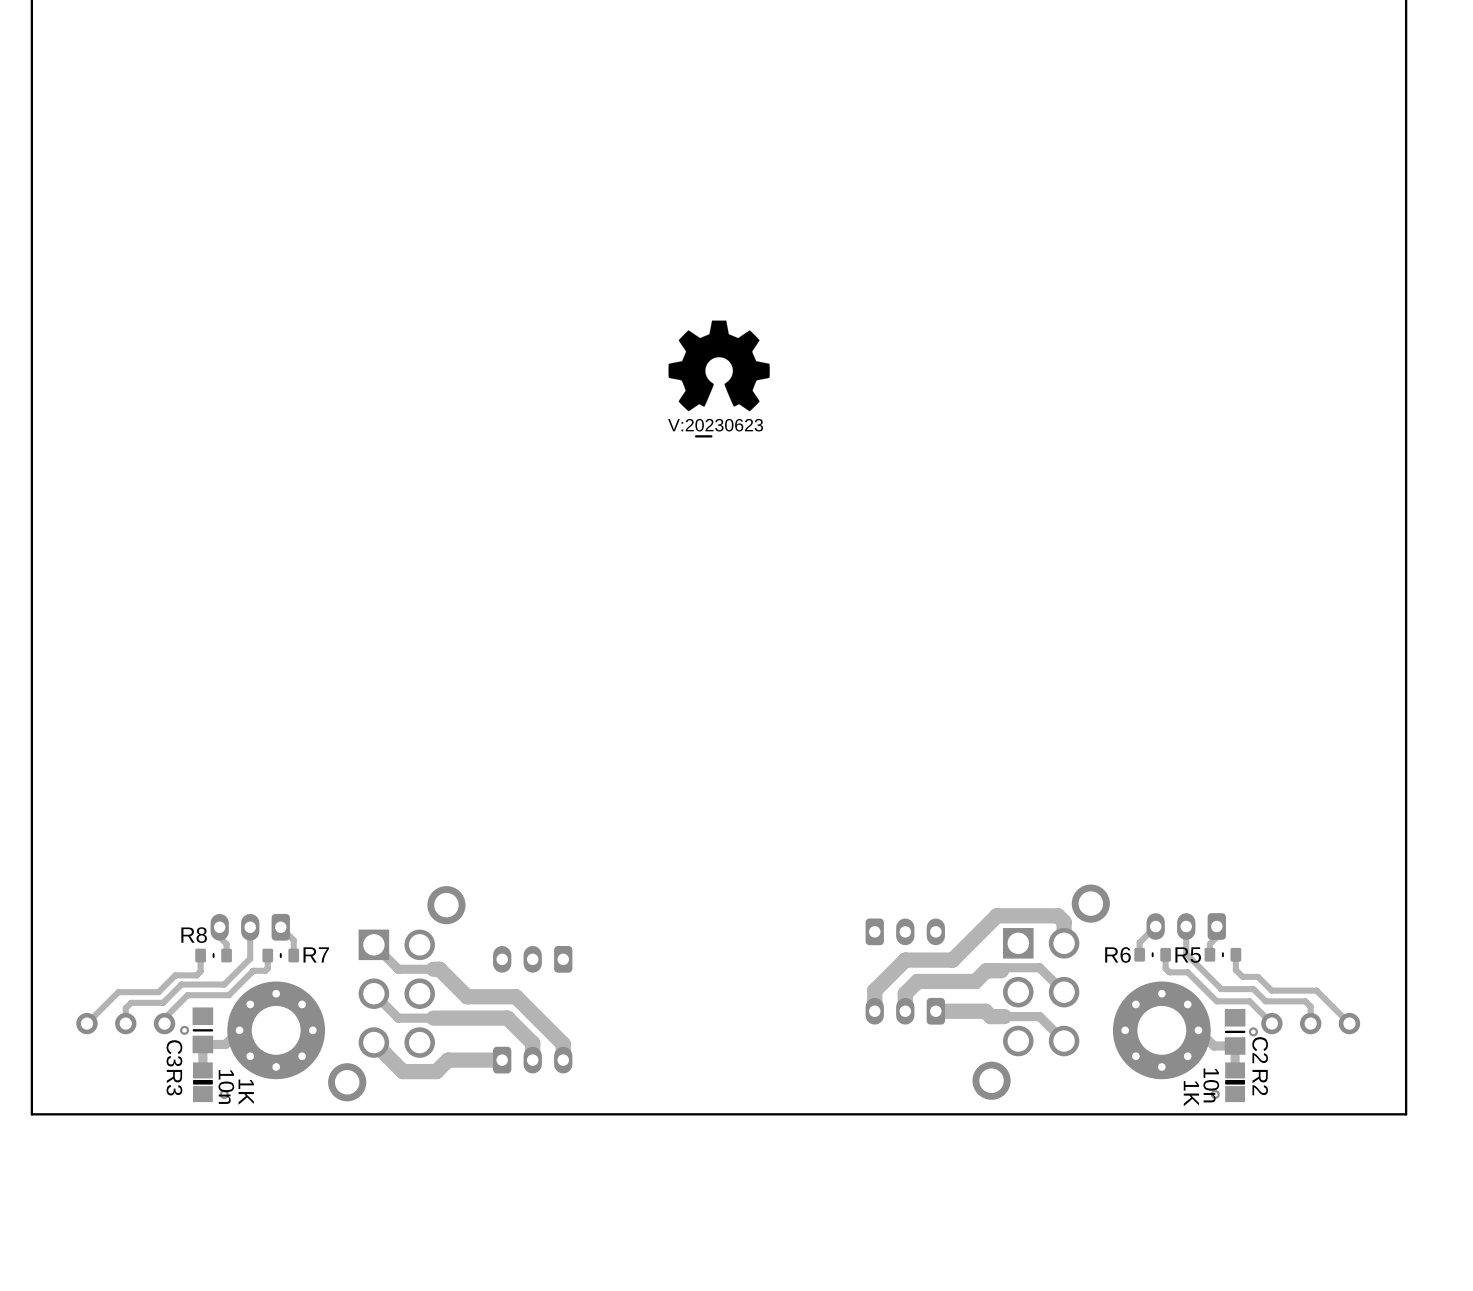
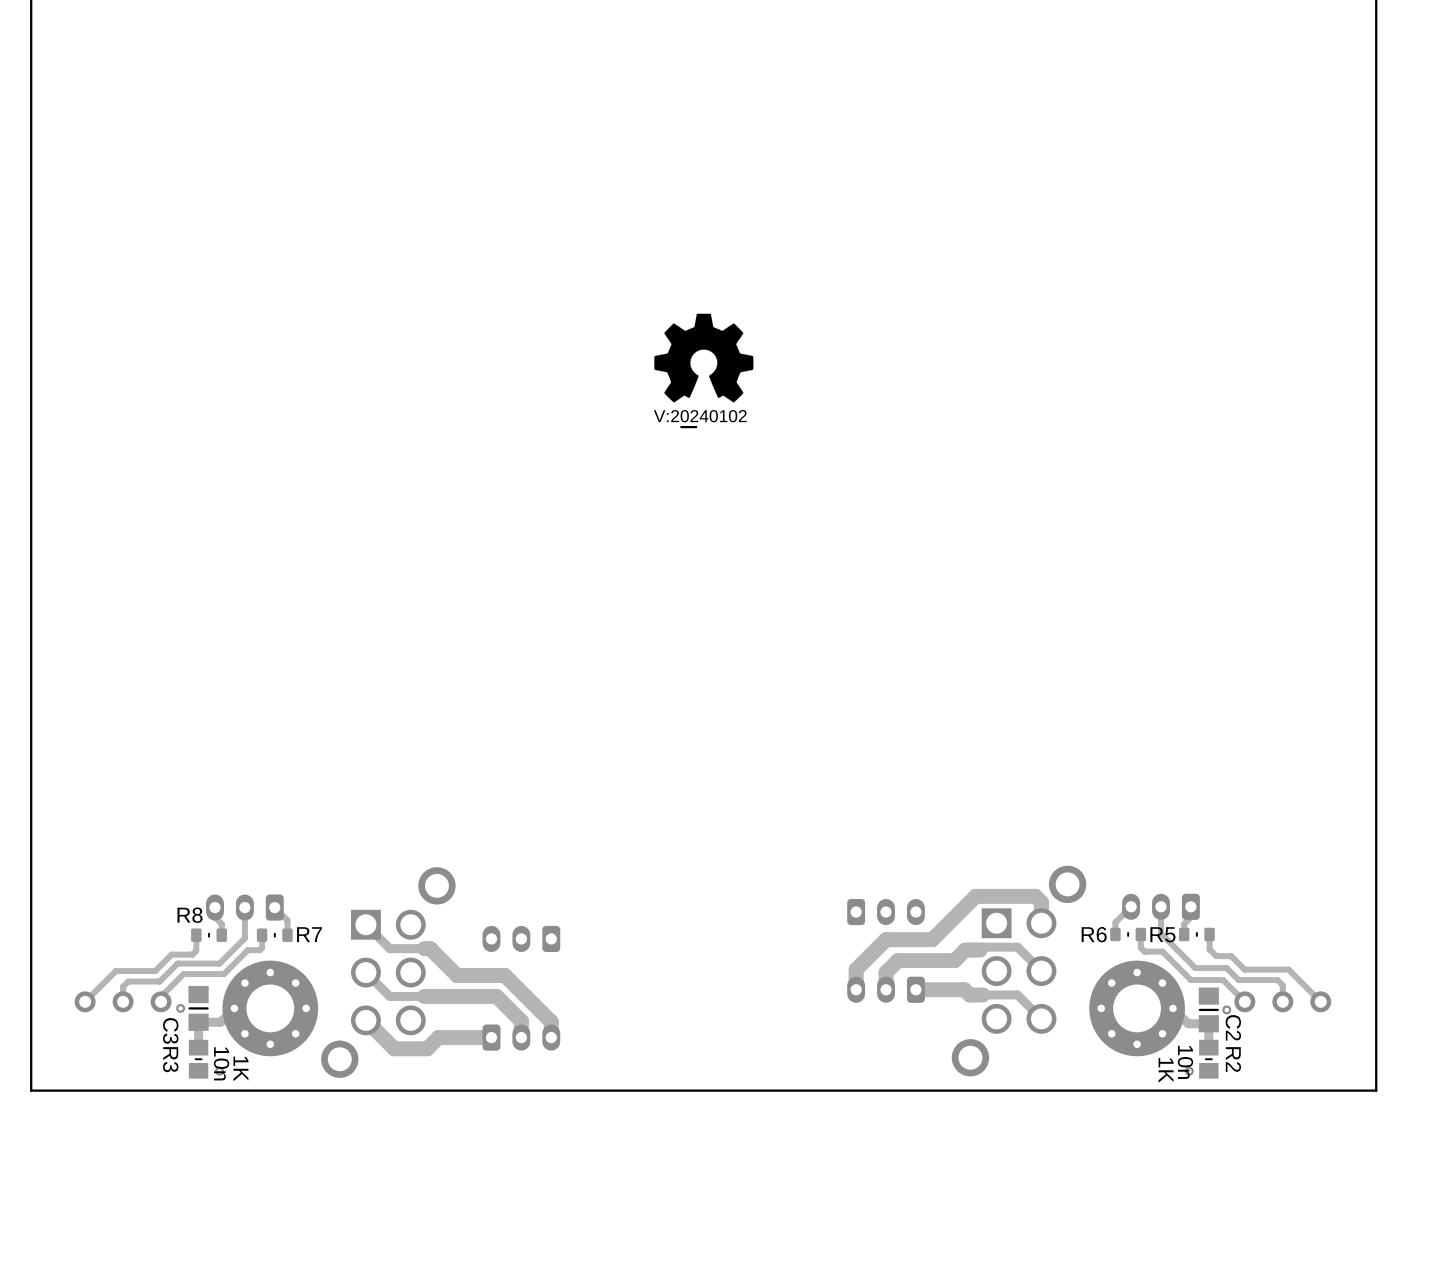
drawing shape: [668, 418, 764, 438] -> [653, 410, 747, 429]
R3 footprint: [192, 1062, 213, 1103] -> [188, 1039, 209, 1079]
R2 footprint: [1225, 1062, 1246, 1103] -> [1199, 1039, 1219, 1079]

